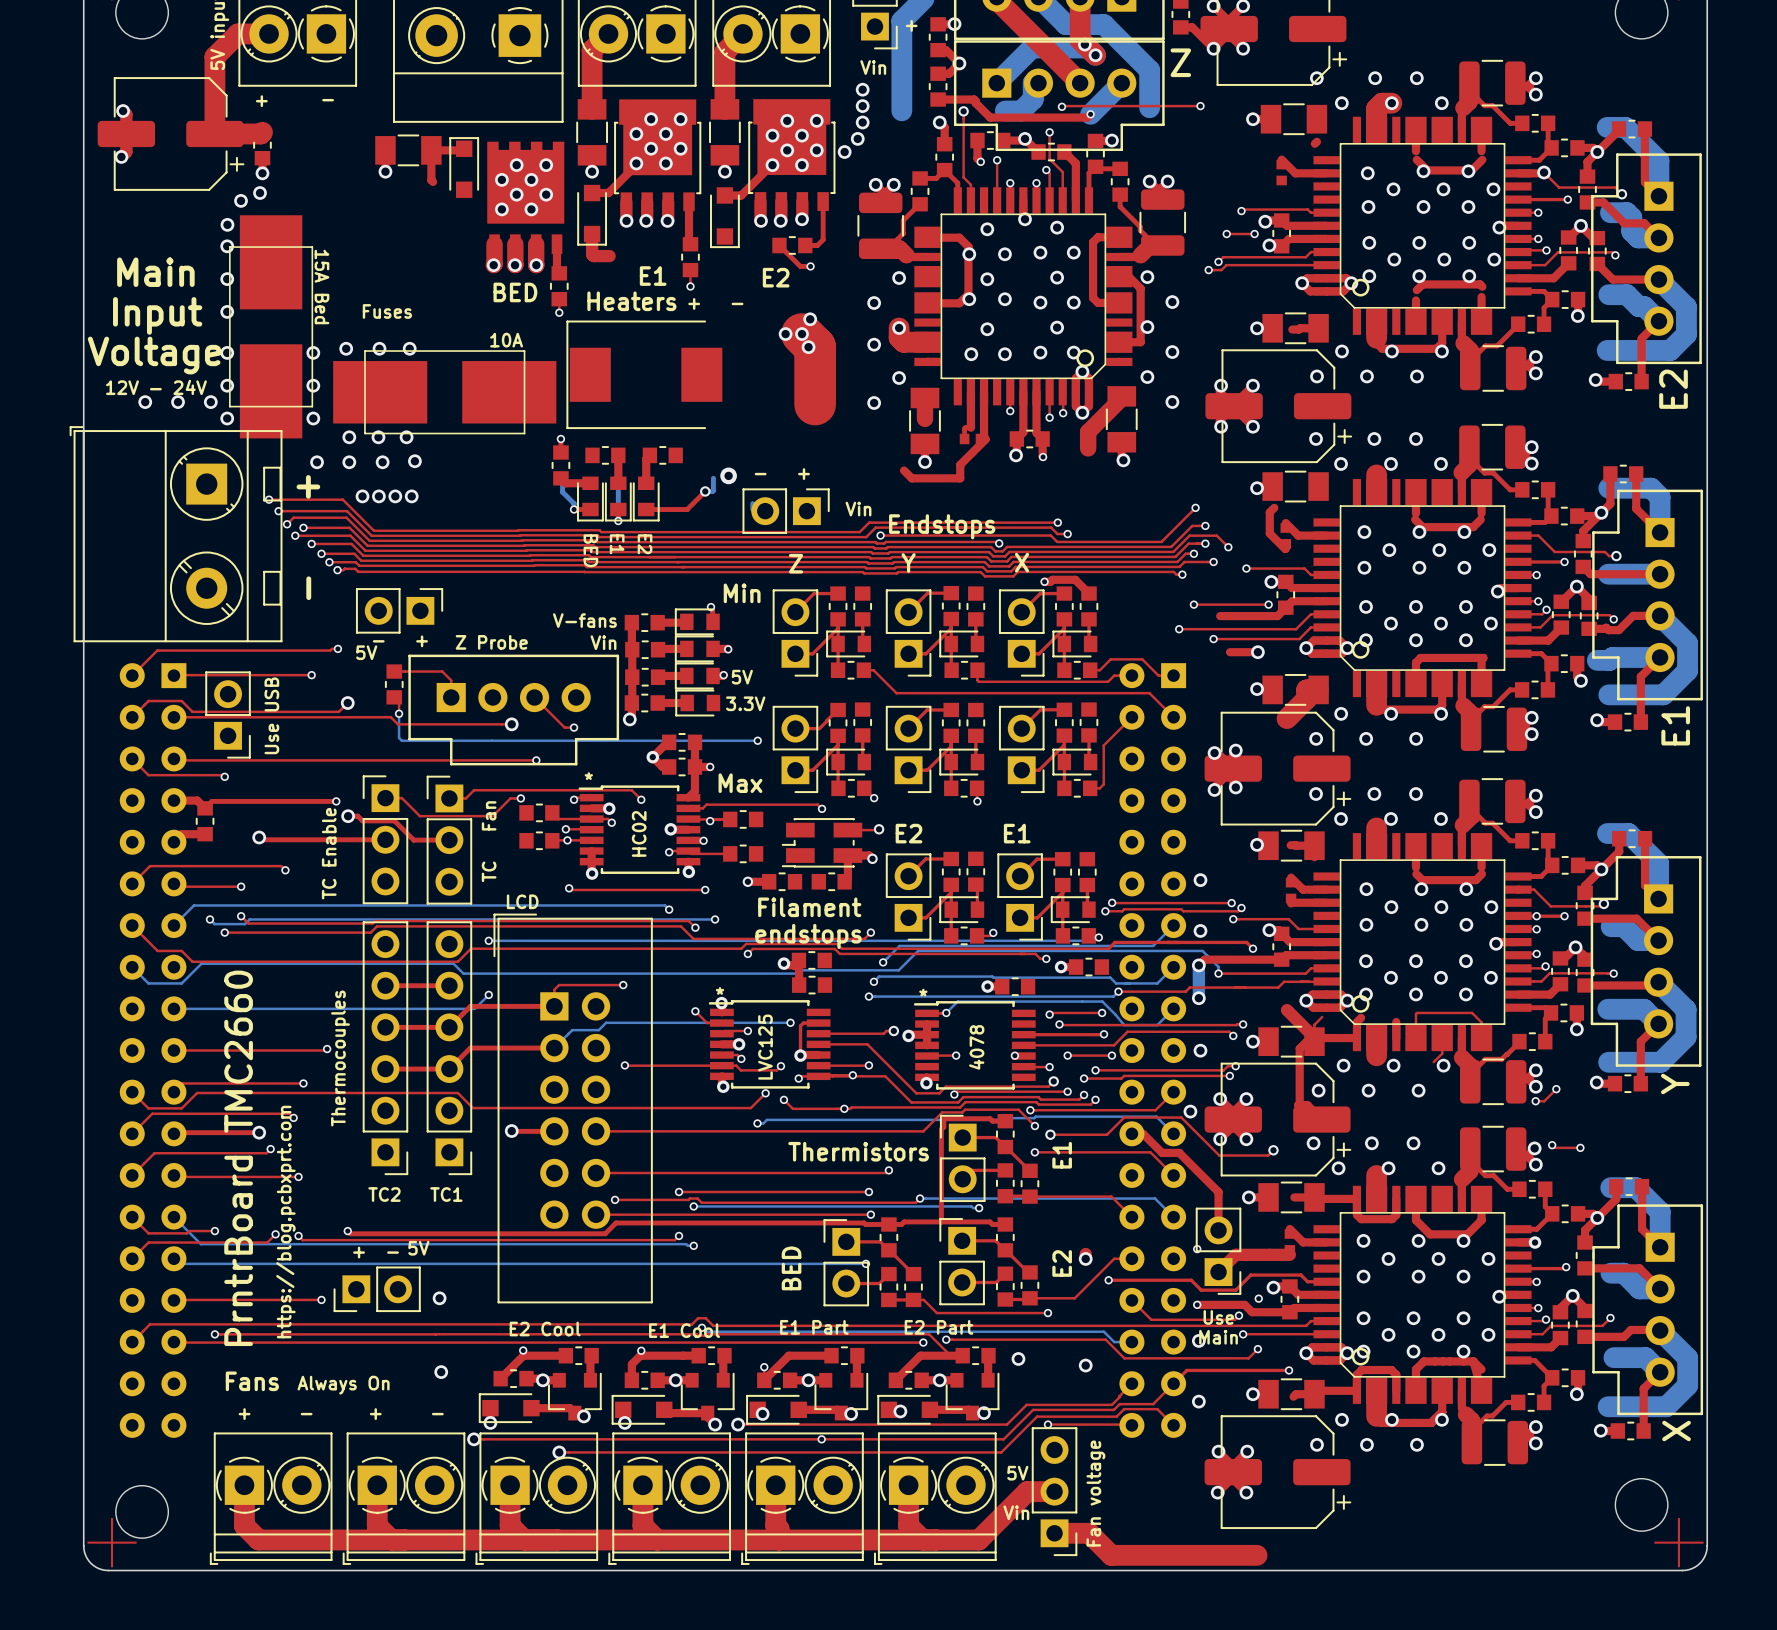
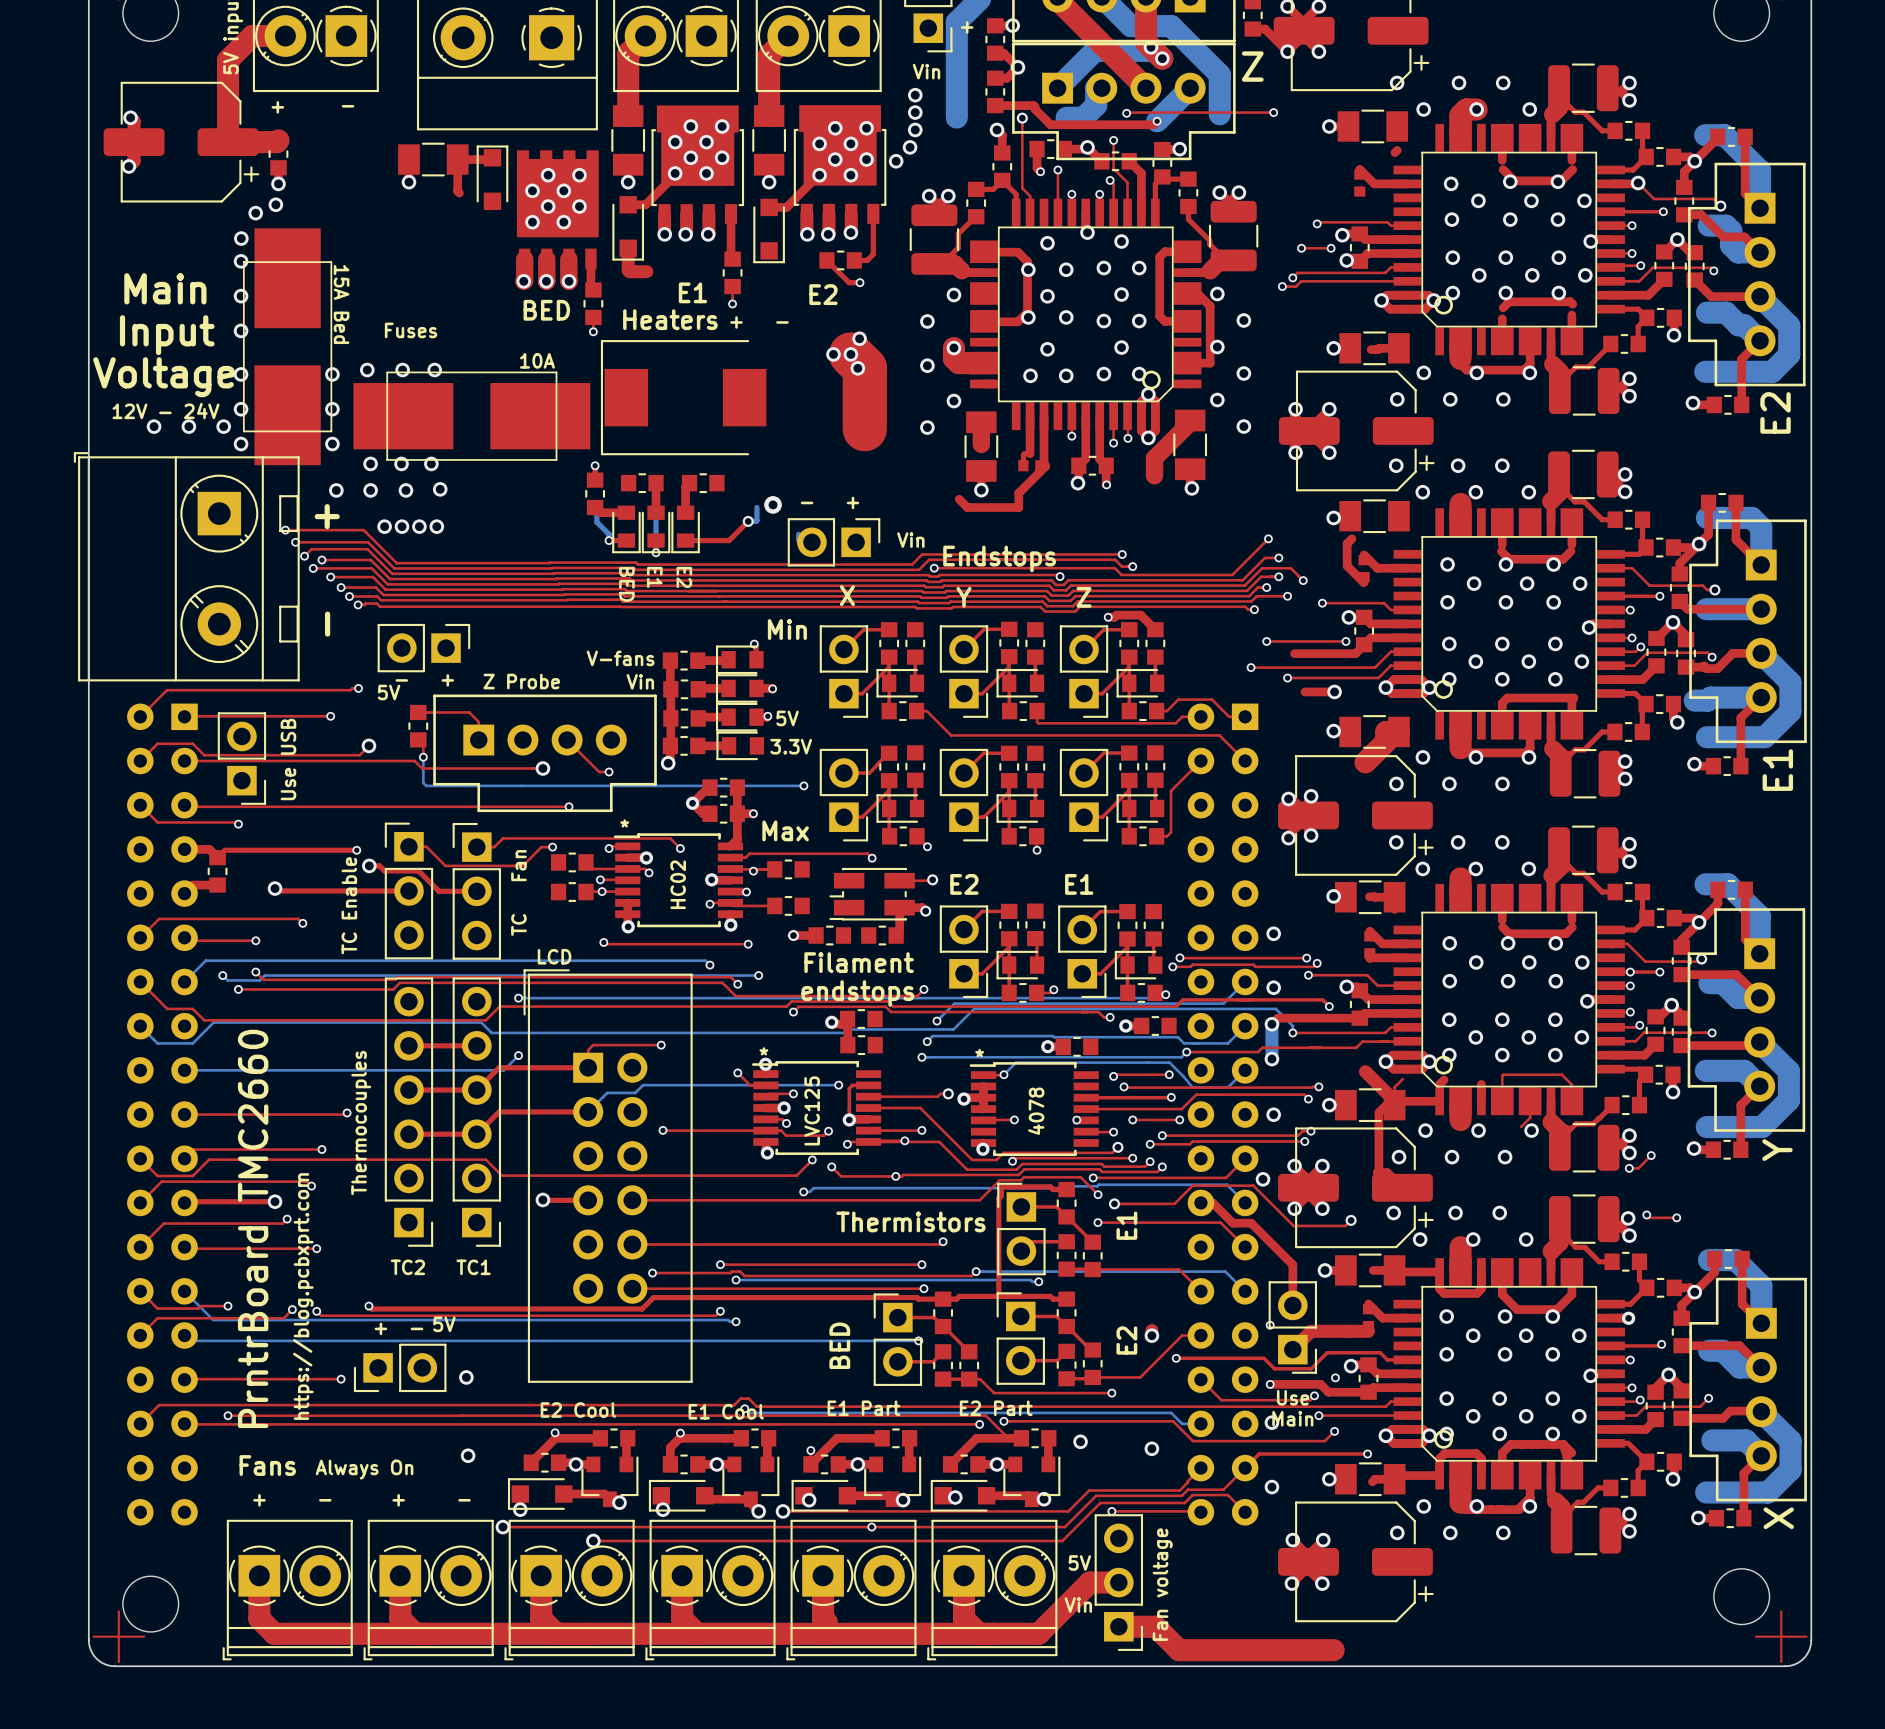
text: X (1022, 562) -> Z (1084, 597)
text: Z (796, 563) -> X (847, 595)

